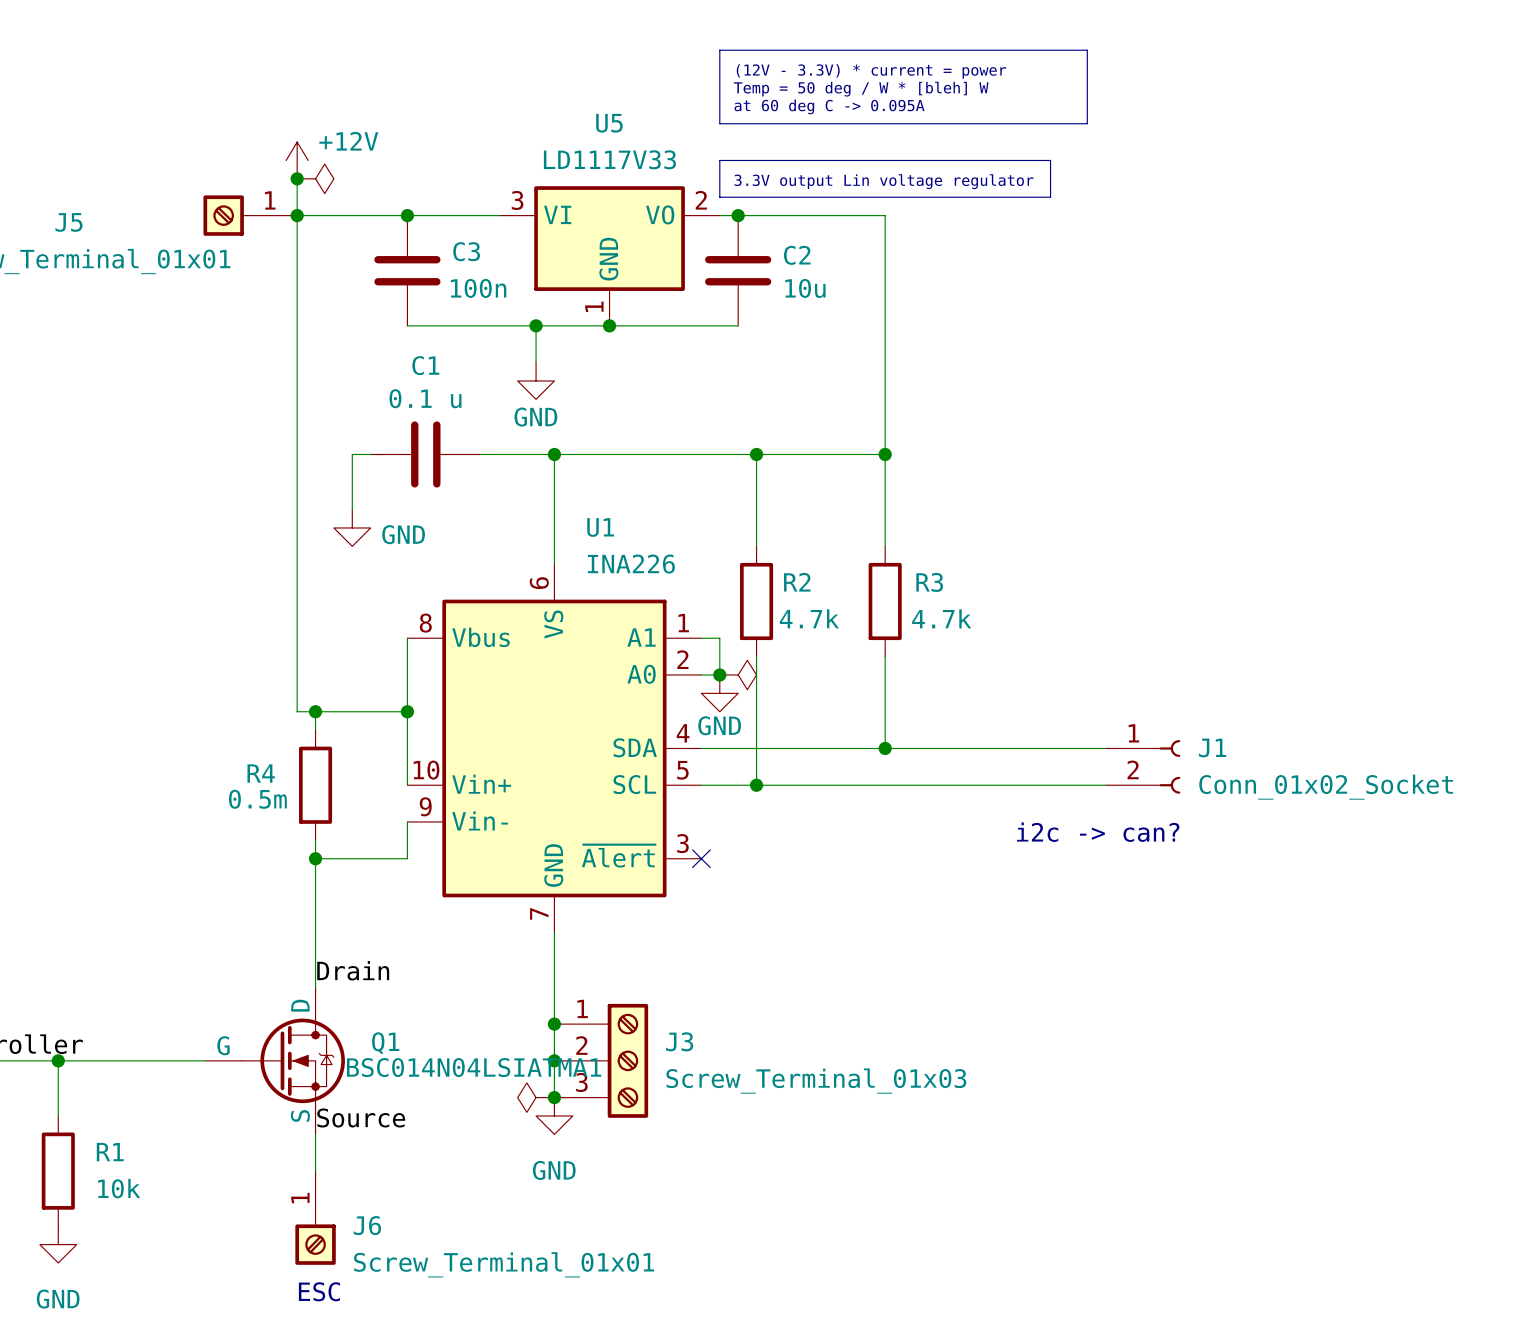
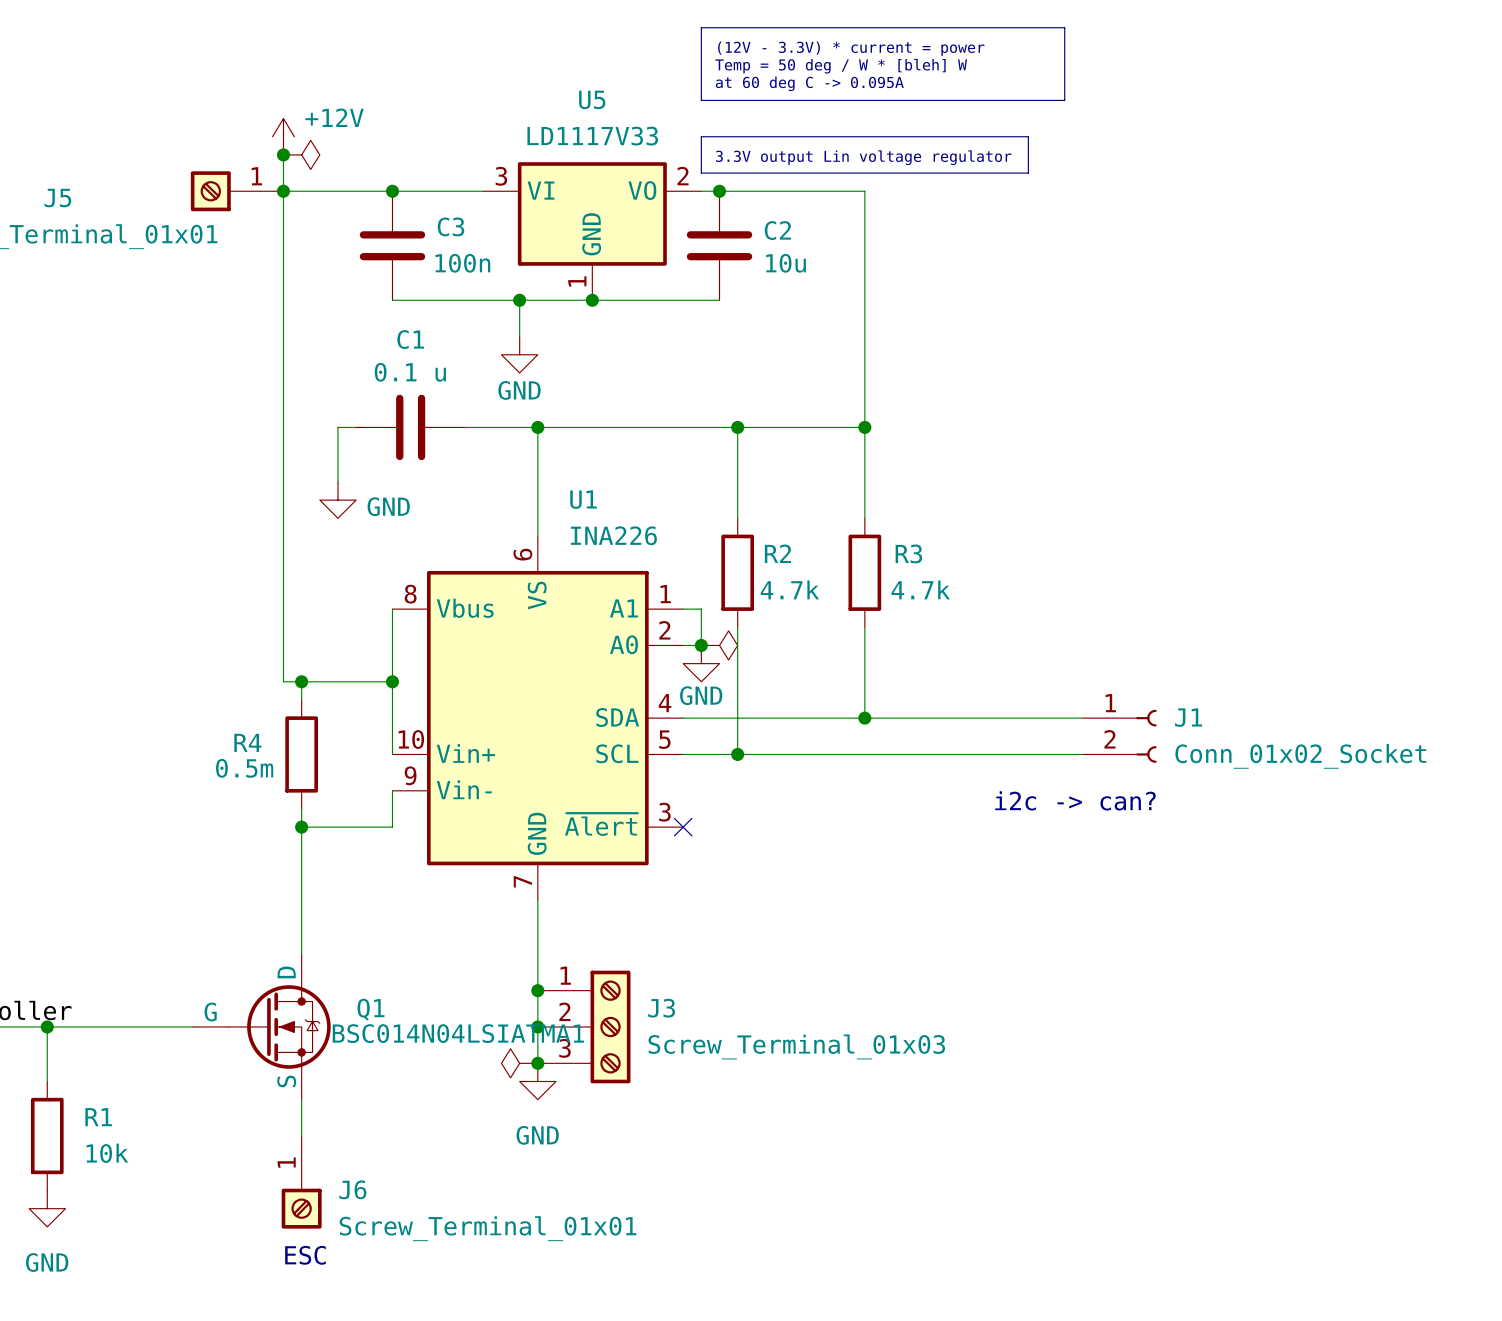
label: Drain (353, 970) -> none
label: Source (361, 1117) -> none

